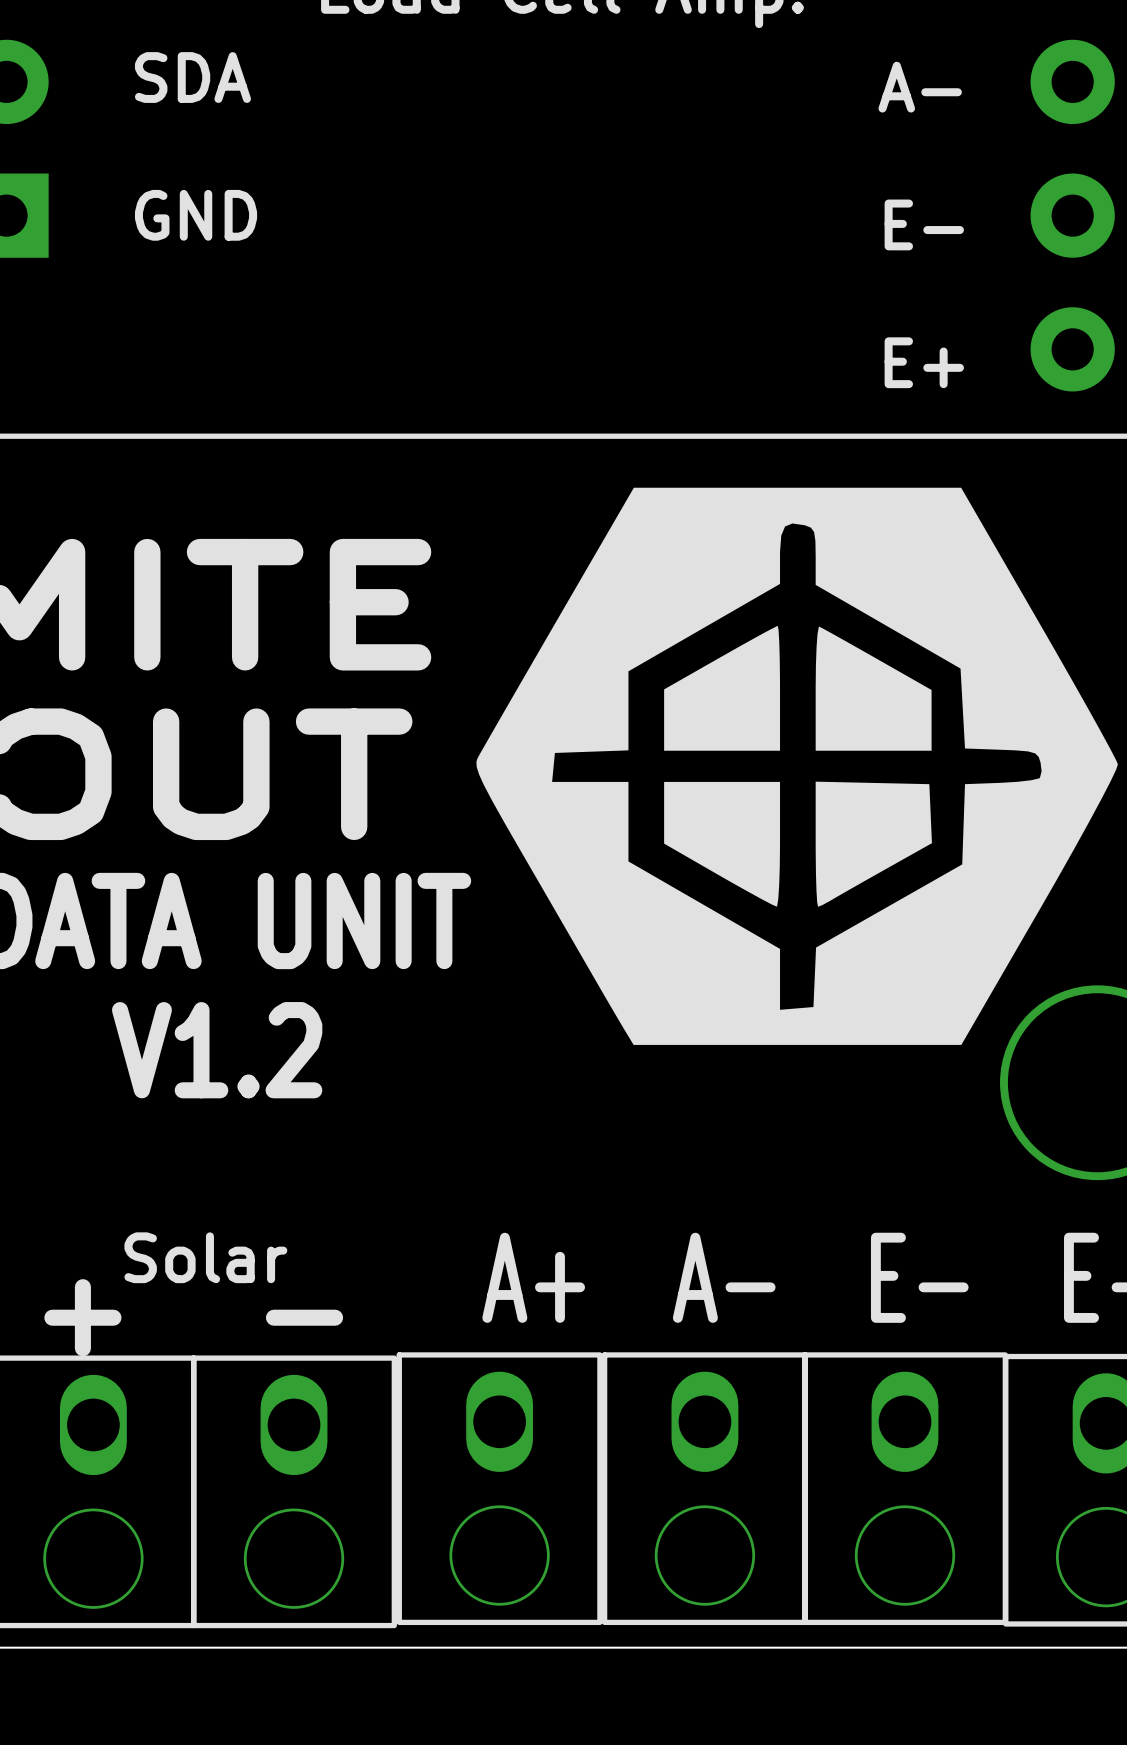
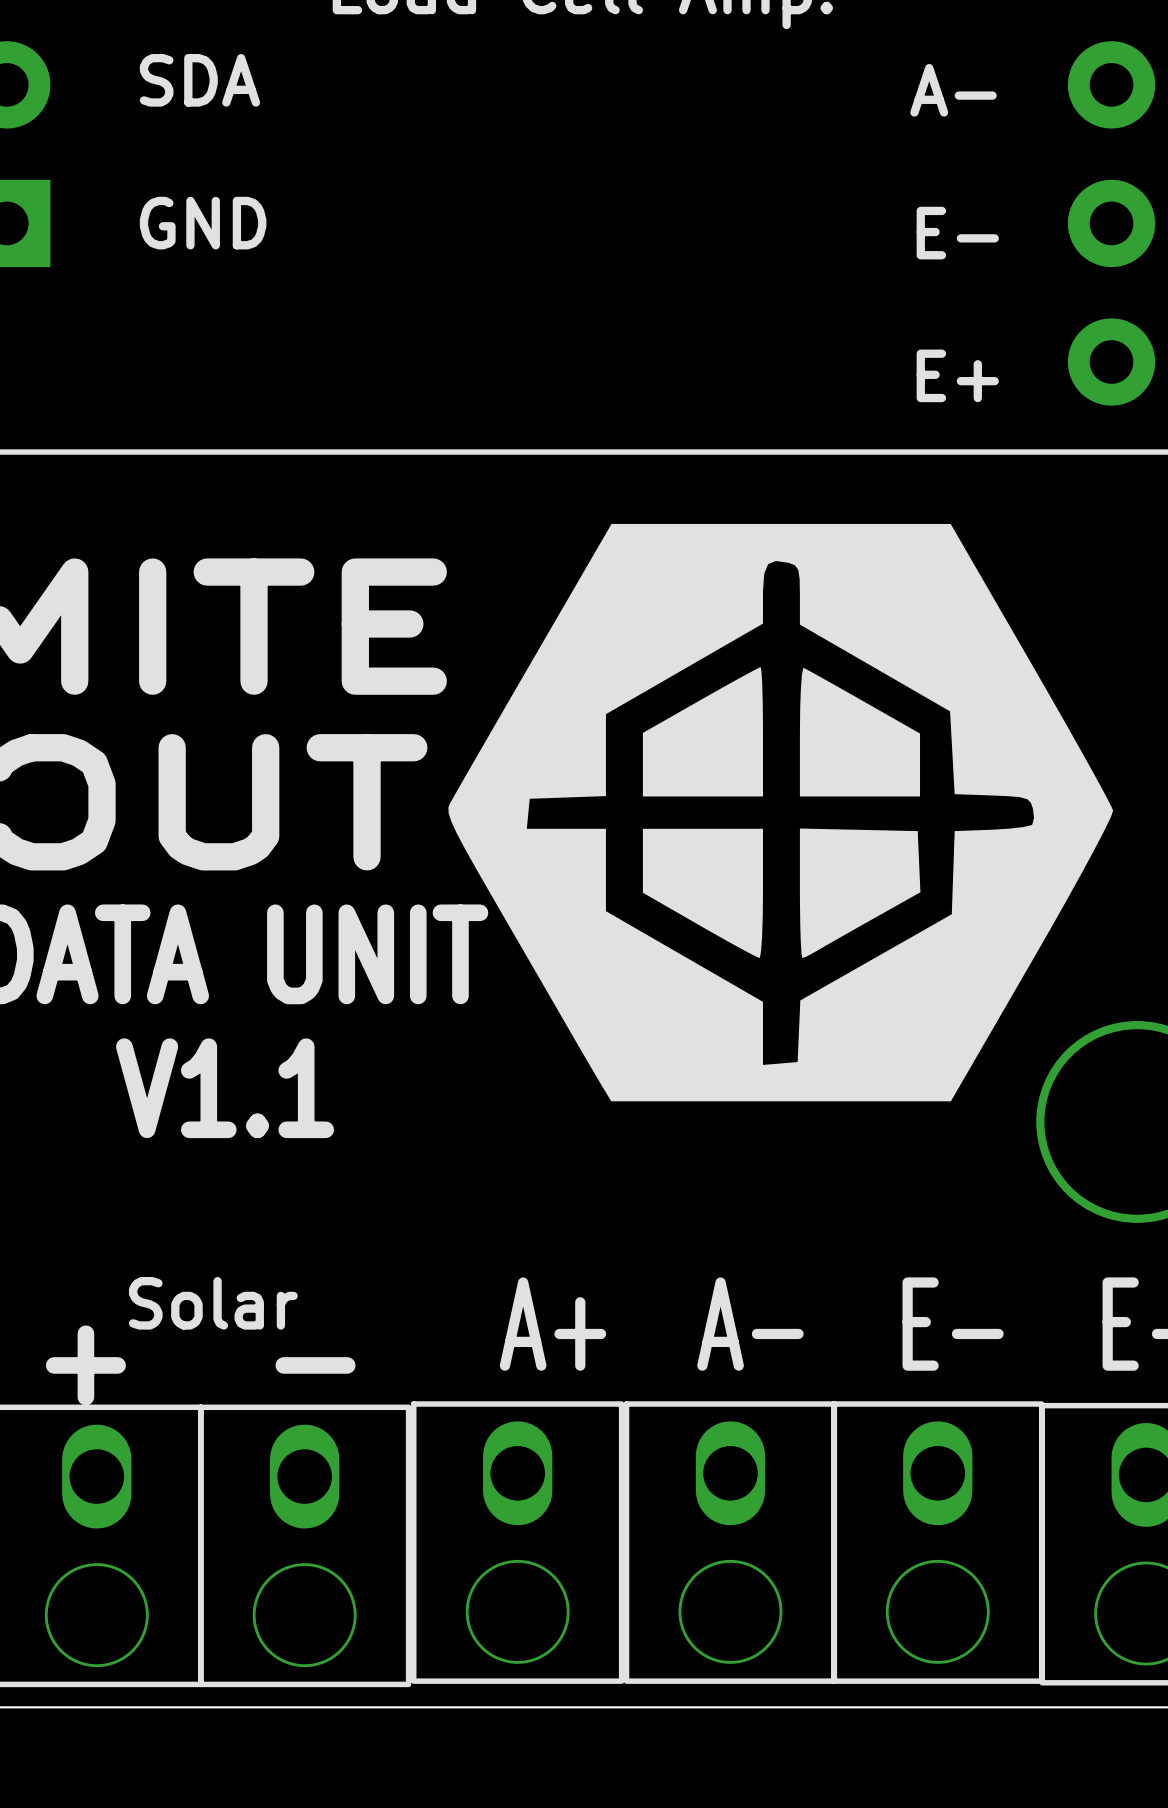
drawing position: (797, 766) -> (780, 812)
text: V1.2 (217, 1050) -> V1.1 (225, 1088)

